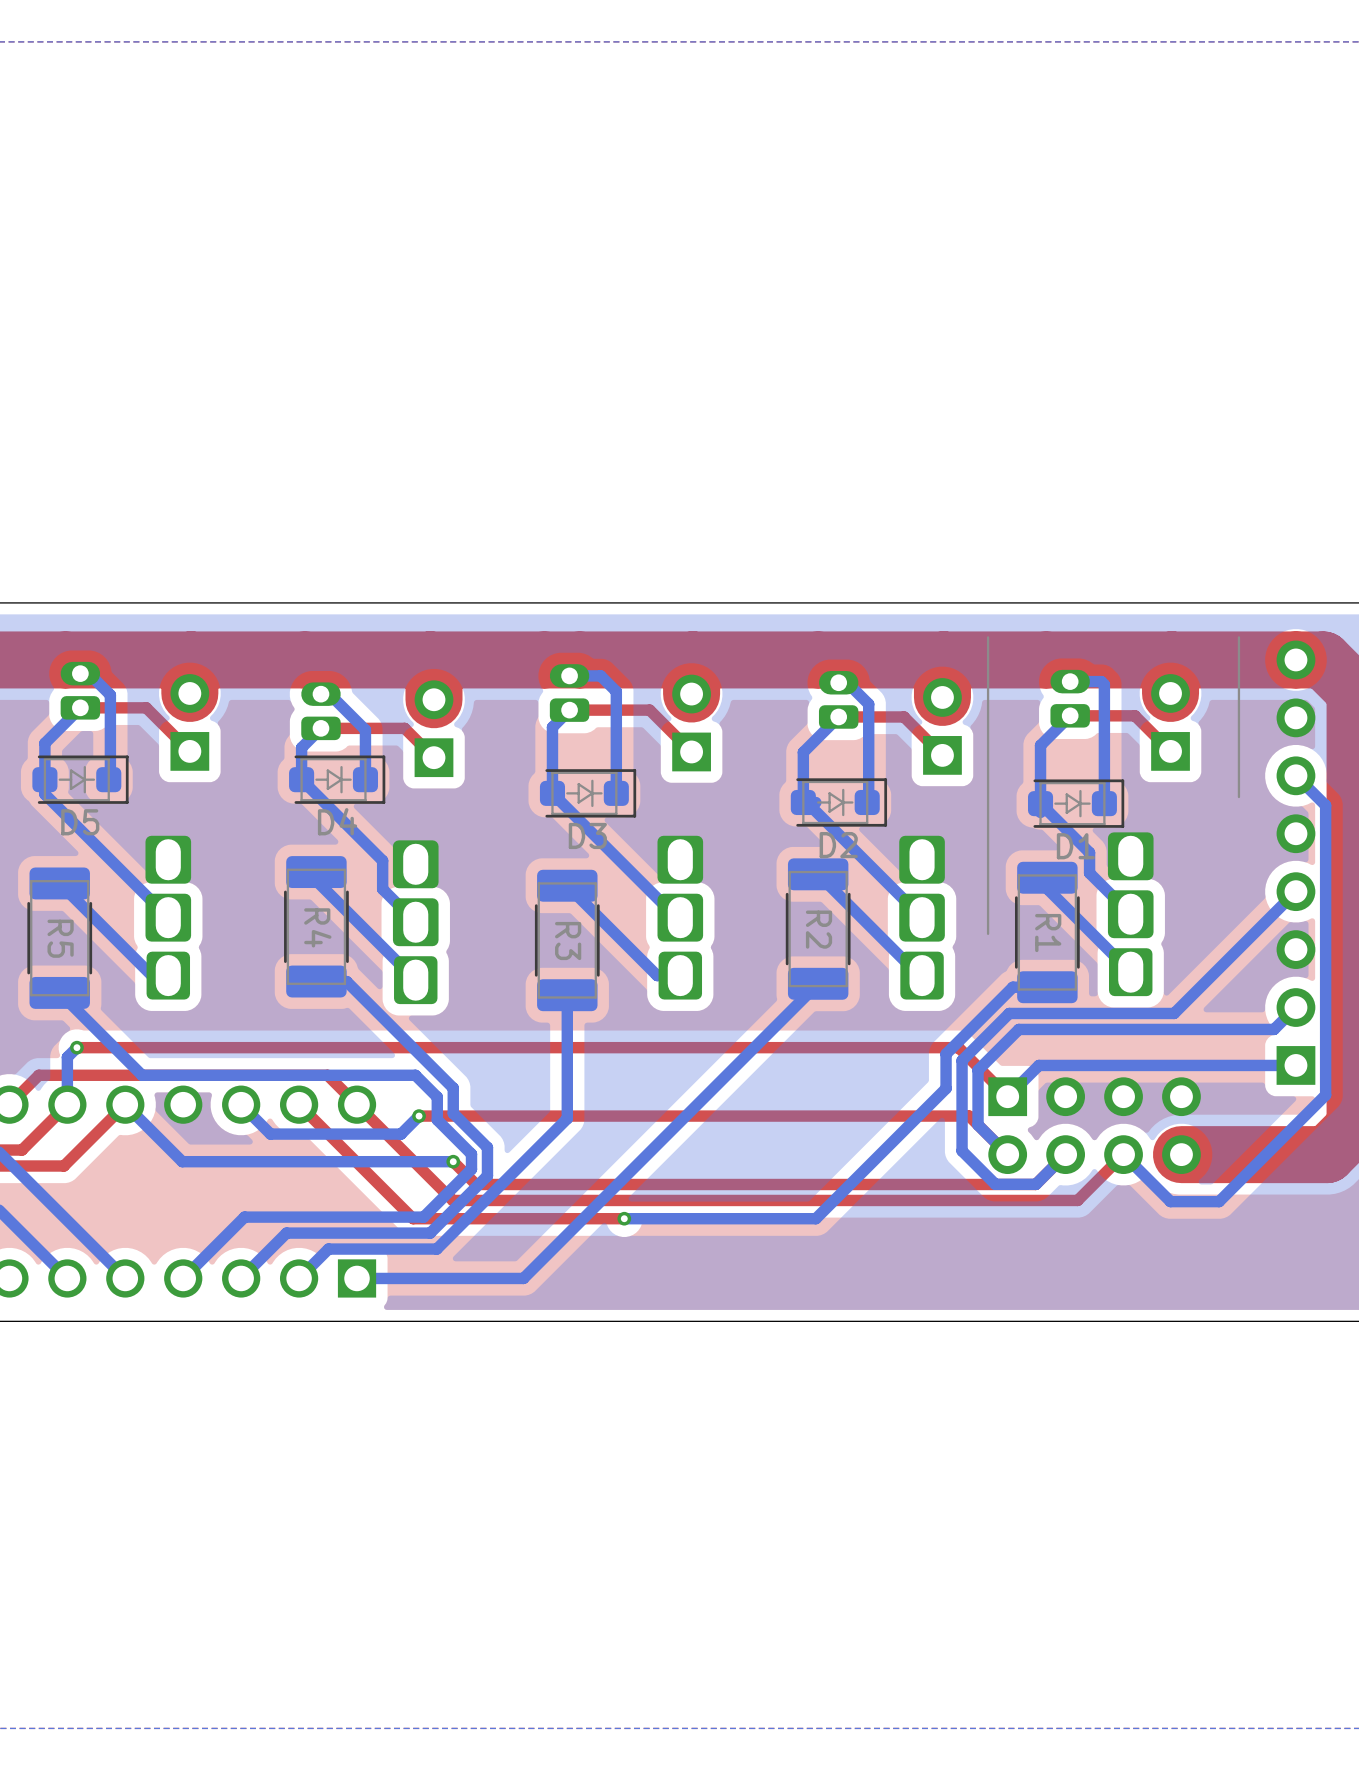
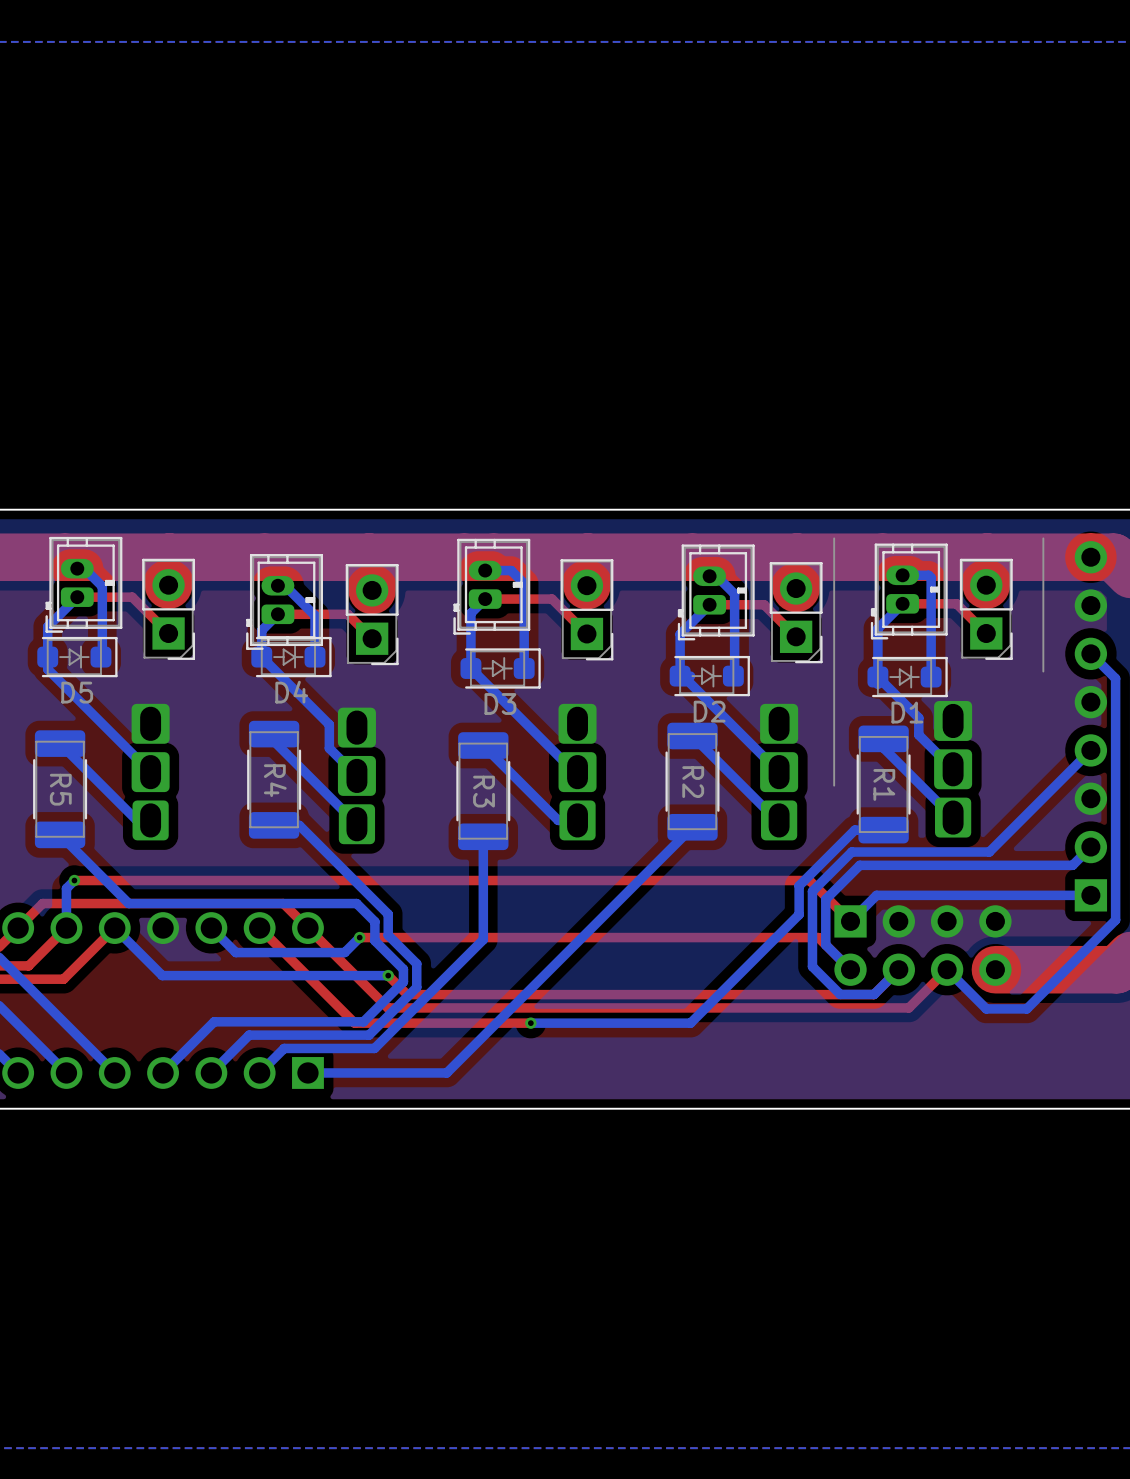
part side: top (80, 690) -> bottom (83, 584)
part side: top (569, 693) -> bottom (491, 586)
part side: top (1070, 698) -> bottom (909, 591)
part side: top (838, 699) -> bottom (716, 592)
part side: top (320, 711) -> bottom (284, 601)
part side: top (189, 722) -> bottom (168, 609)
part side: top (1170, 722) -> bottom (986, 609)
part side: top (691, 723) -> bottom (586, 609)
part side: top (942, 726) -> bottom (796, 612)
part side: top (433, 728) -> bottom (372, 614)

